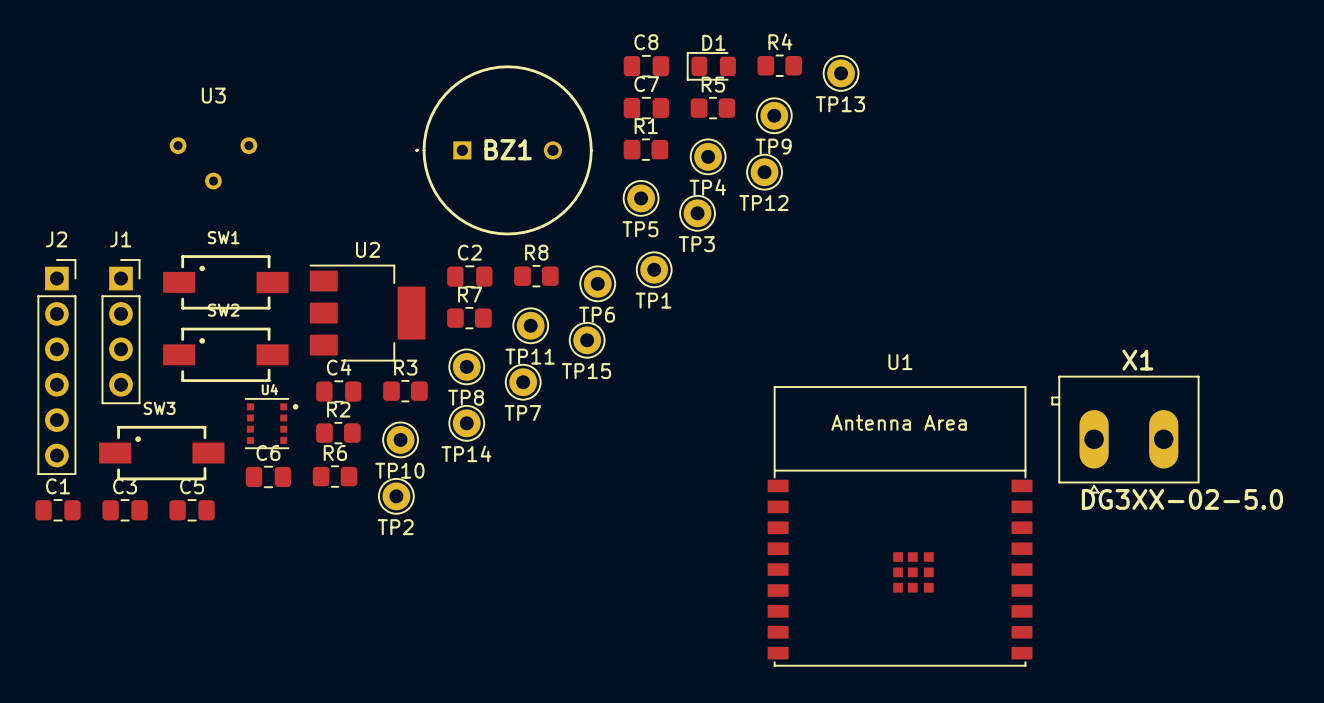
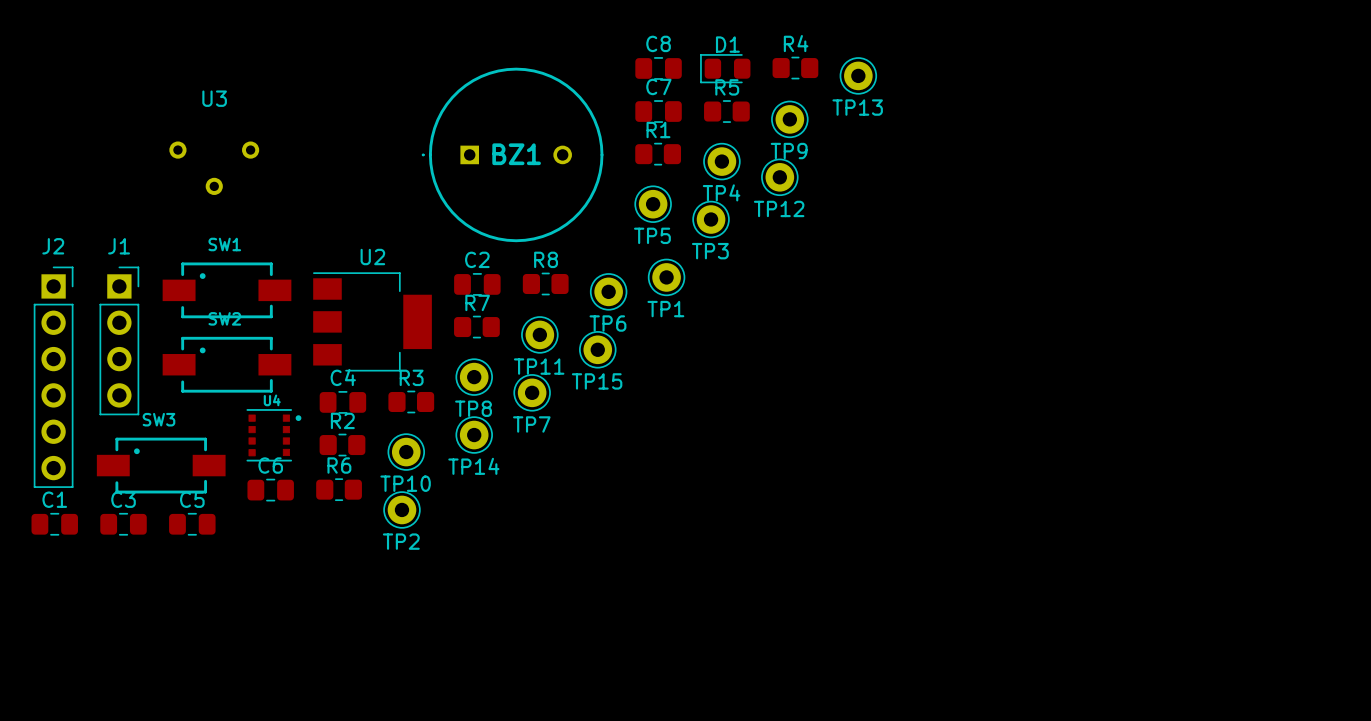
X1: DG3XX-02-5.0 (1125, 434) -> none
U1: (900, 526) -> none

